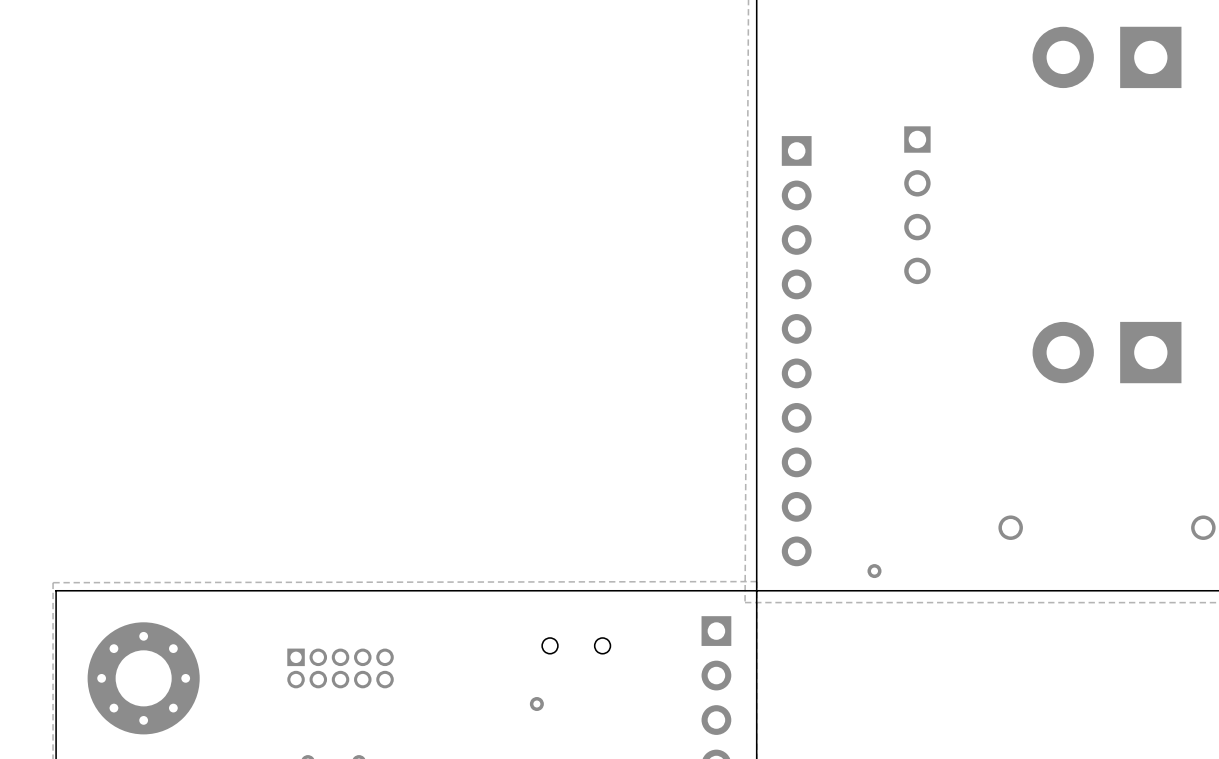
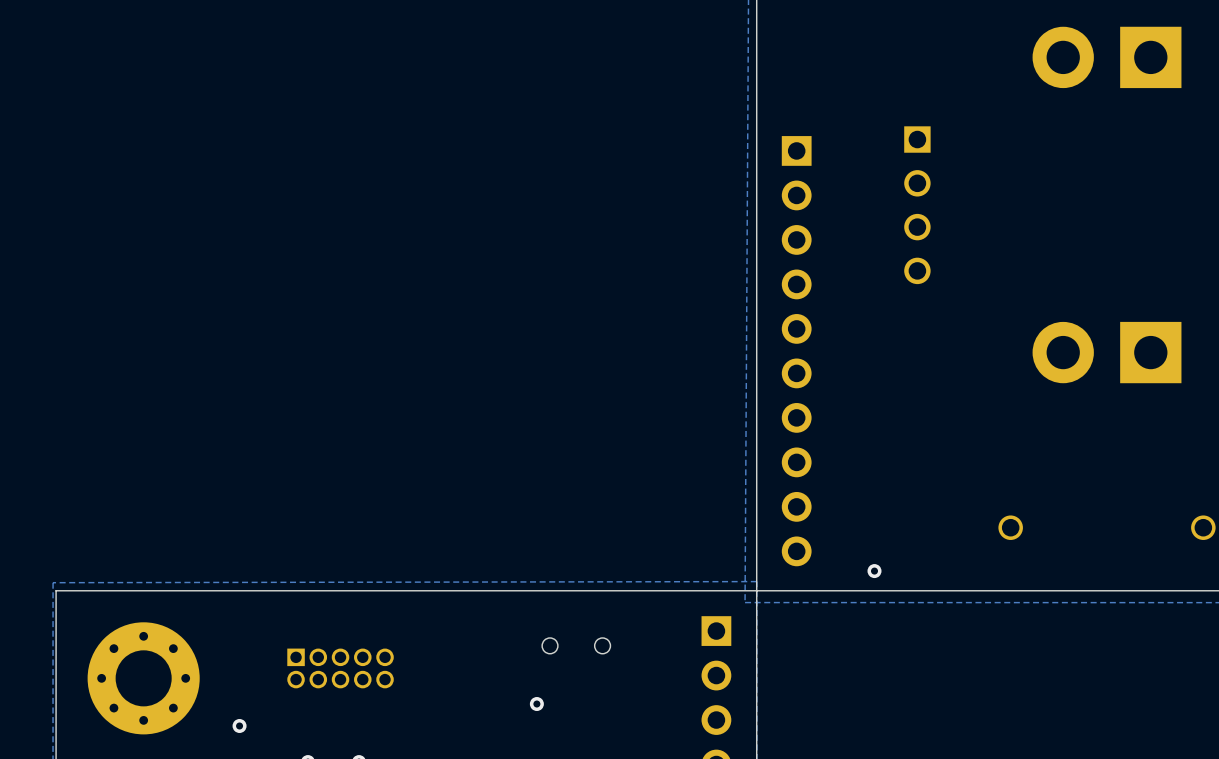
via: none -> (239, 725)

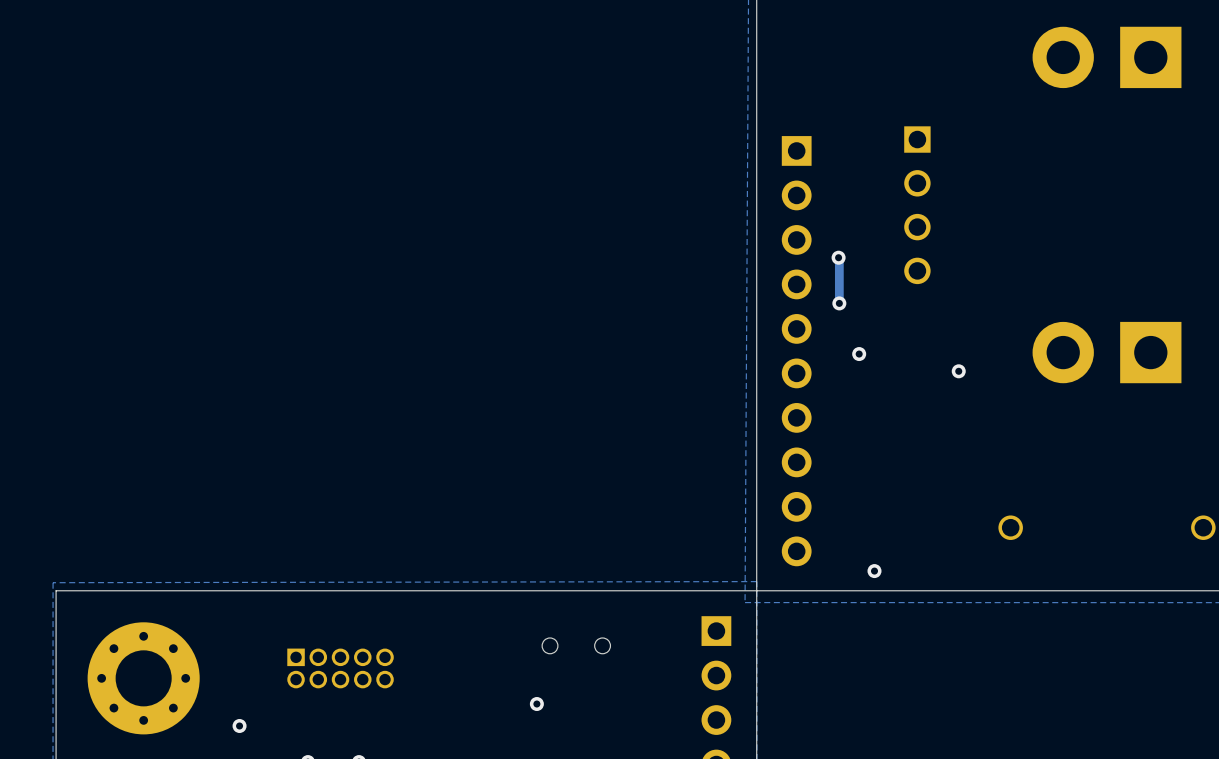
track: none -> (838, 257) (839, 303)
via: none -> (838, 257)
via: none -> (839, 303)
via: none -> (859, 354)
via: none -> (958, 371)

